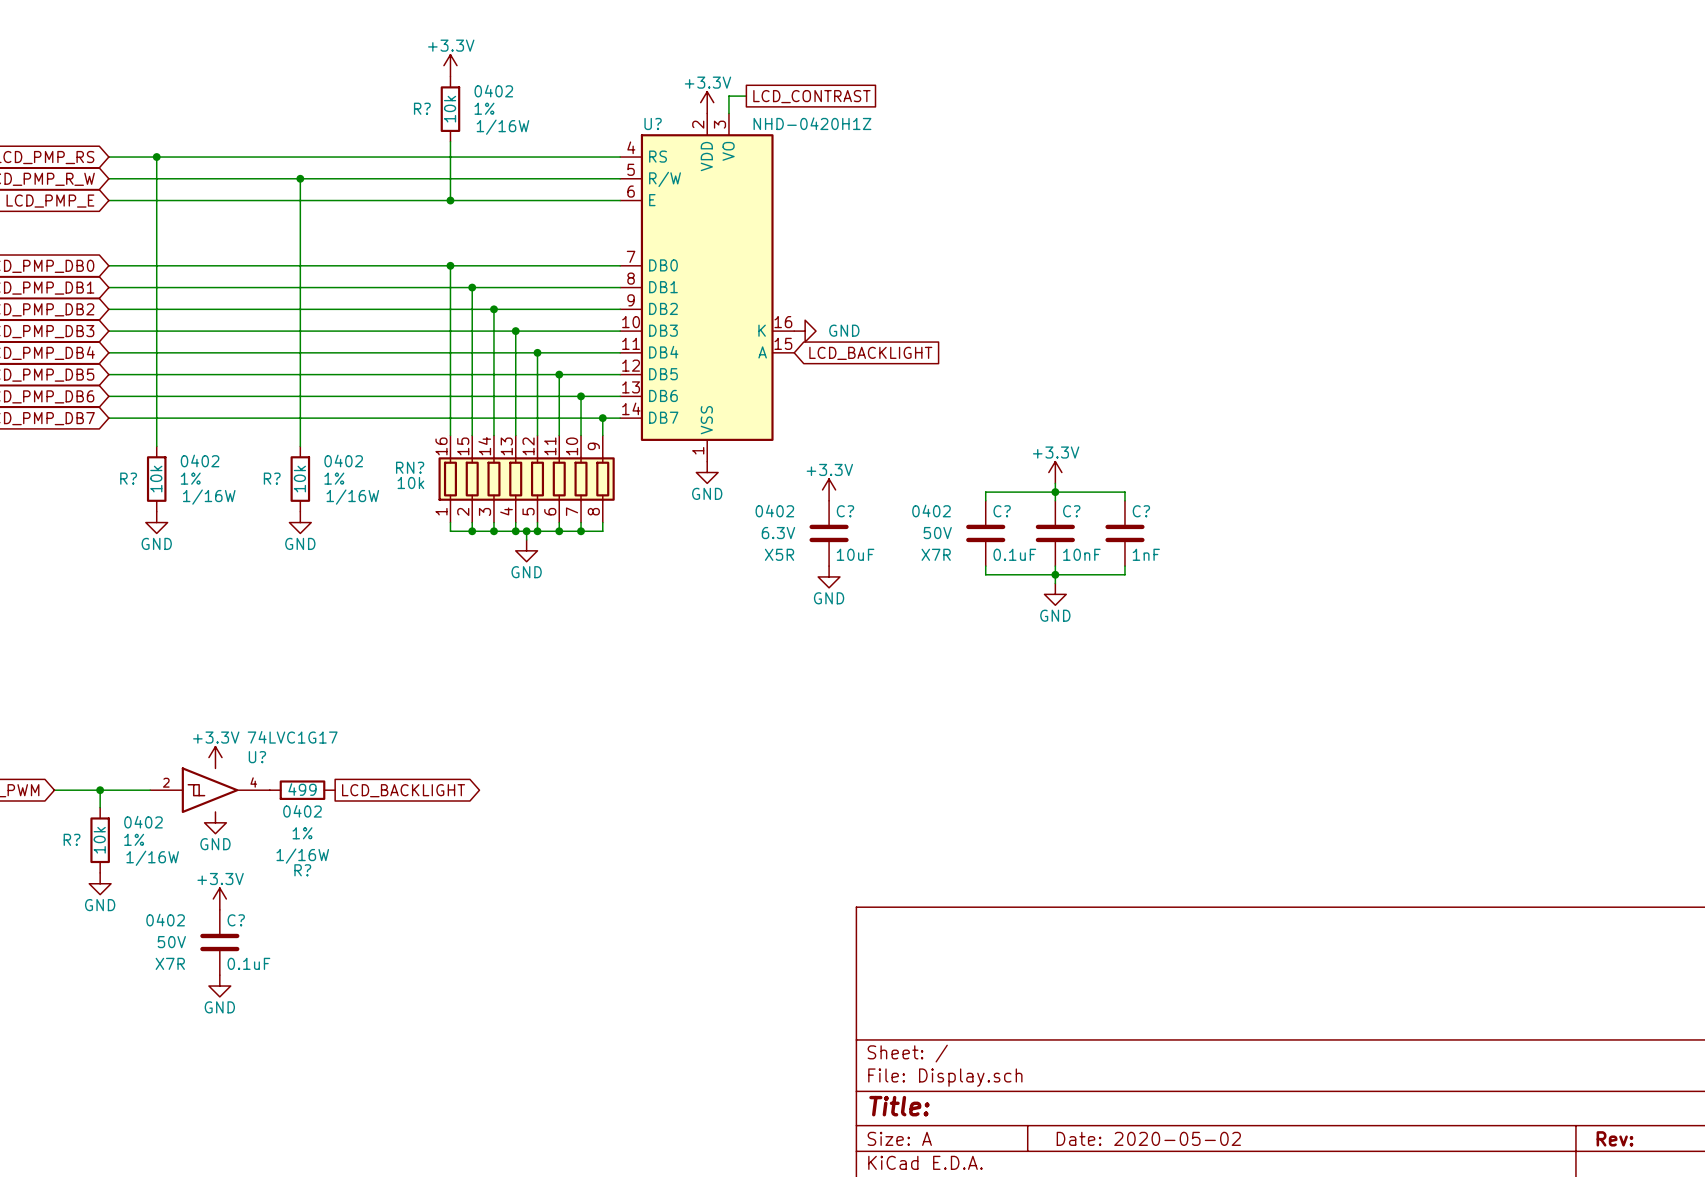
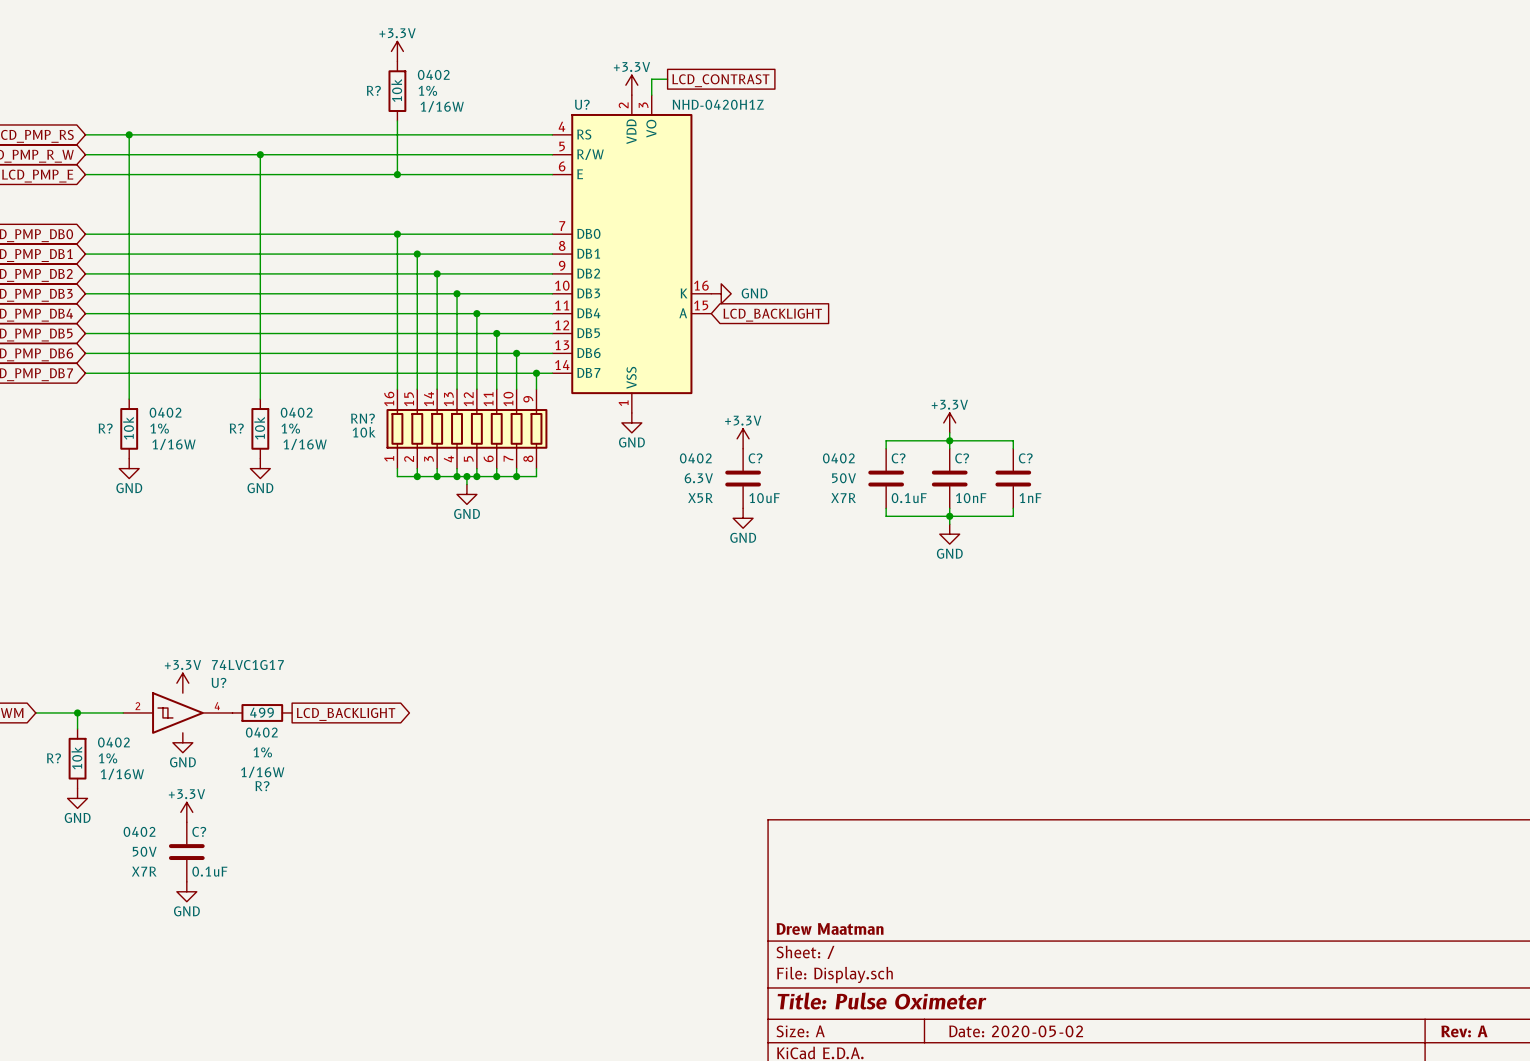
title block: none -> Drew Maatman (830, 928)
title block: Title: (899, 1106) -> Title: Pulse Oximeter (881, 1001)
title block: Rev: (1614, 1138) -> Rev: A (1464, 1031)

